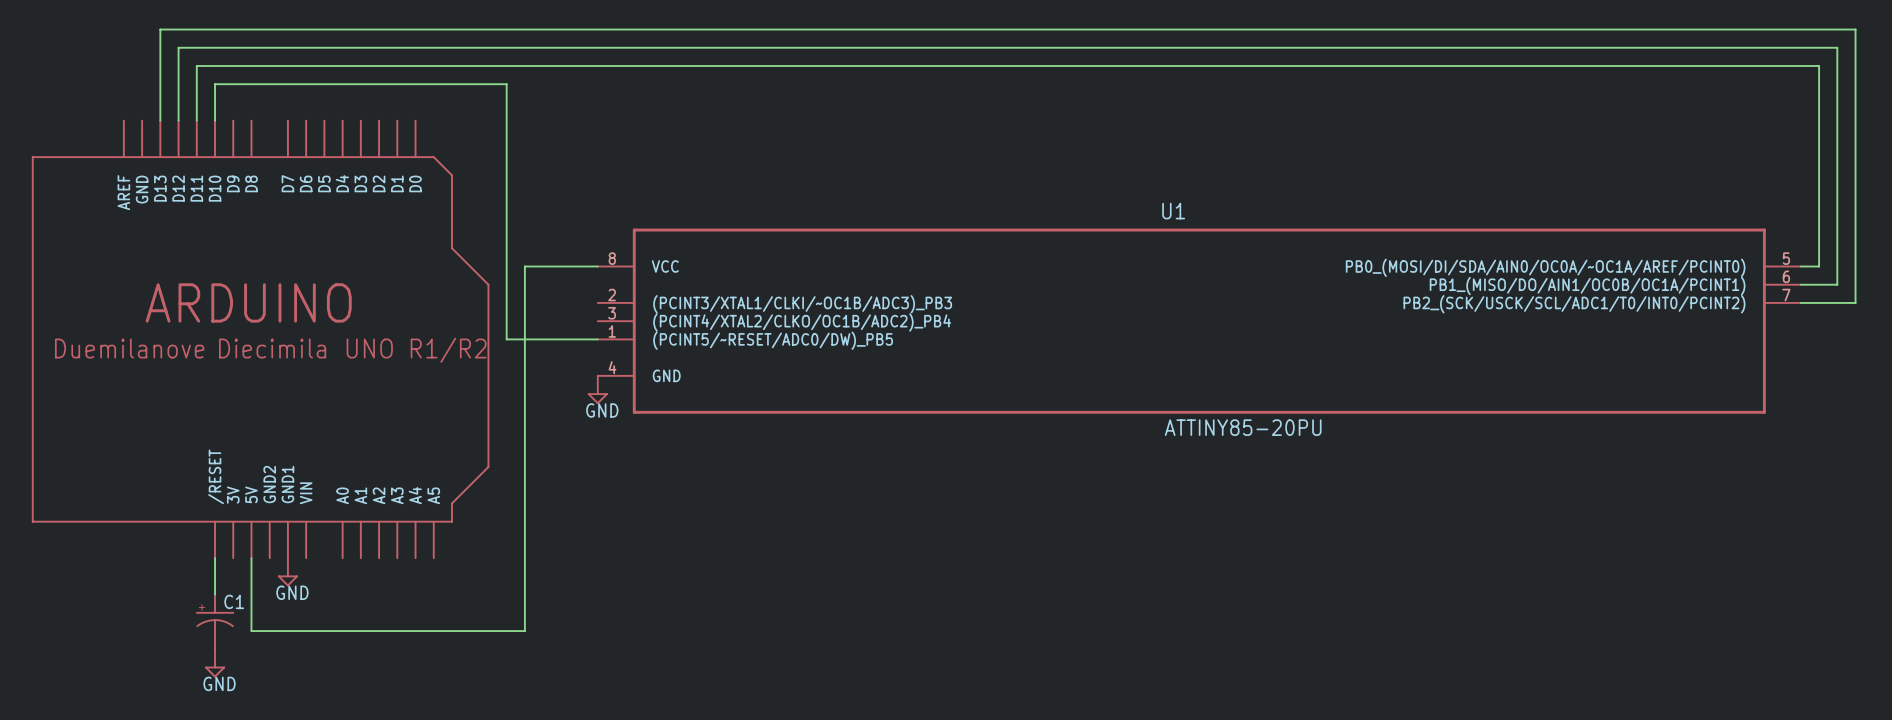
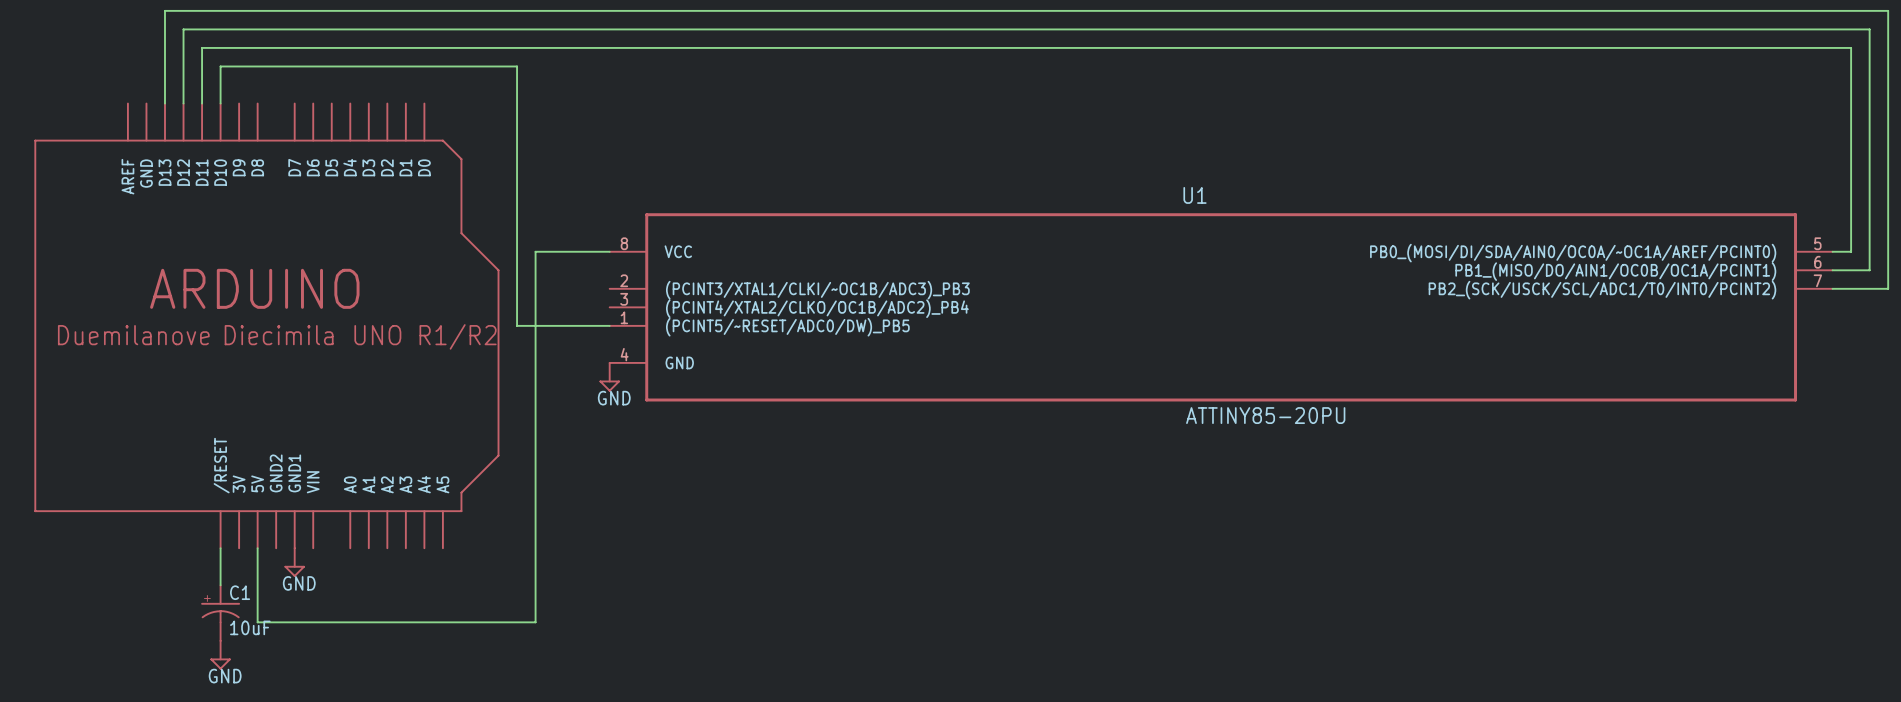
C1 value: none -> 10uF (250, 627)

